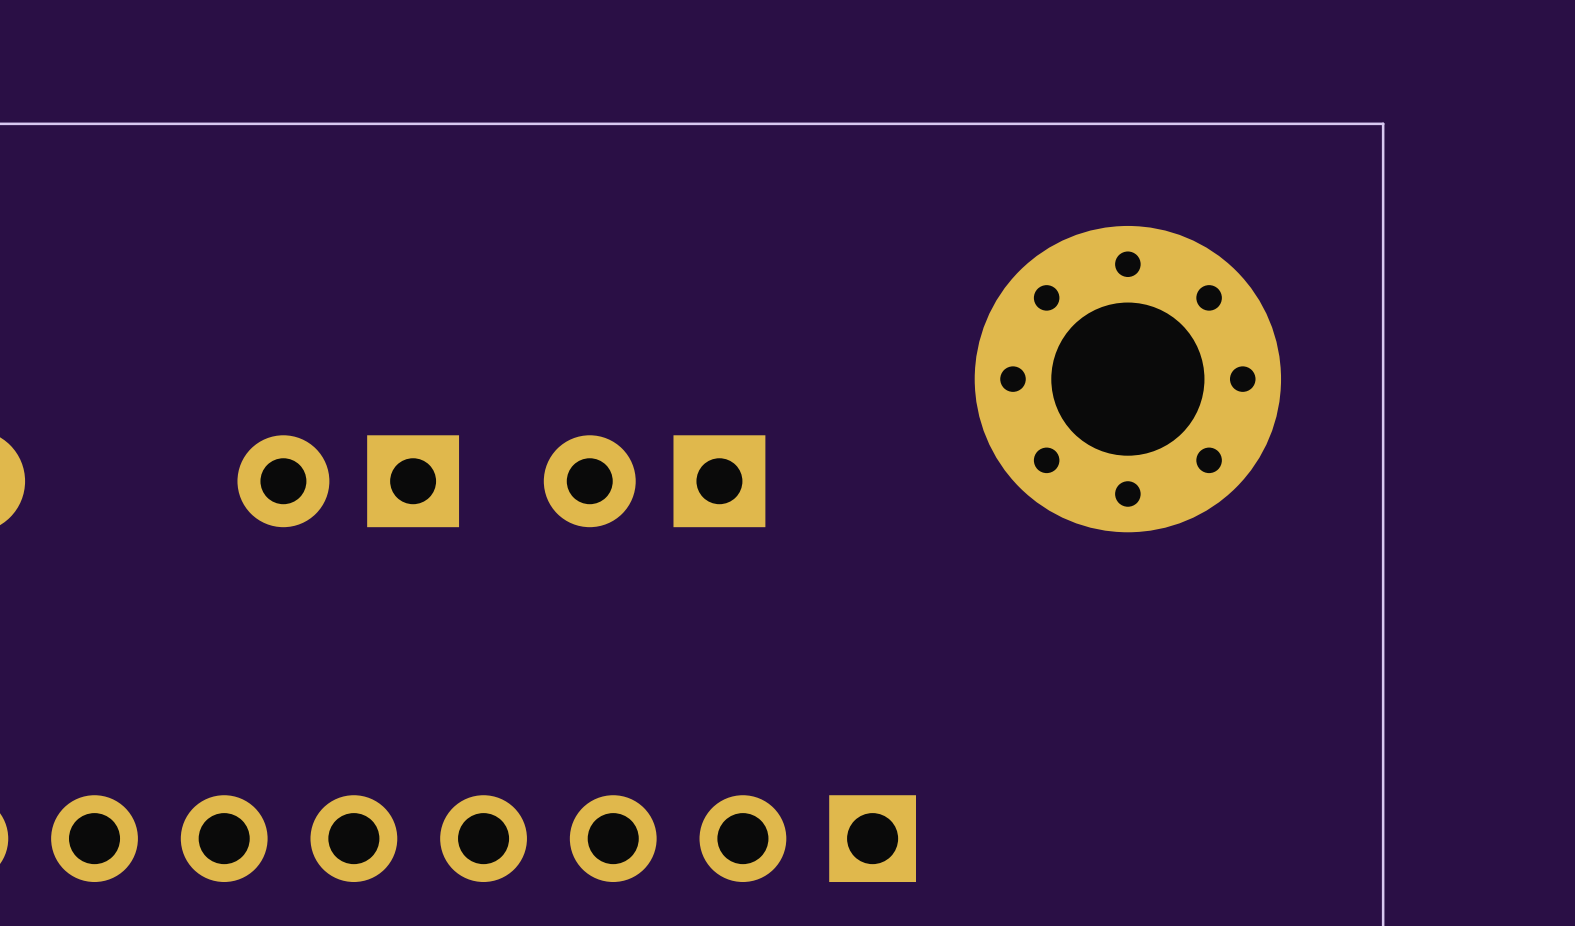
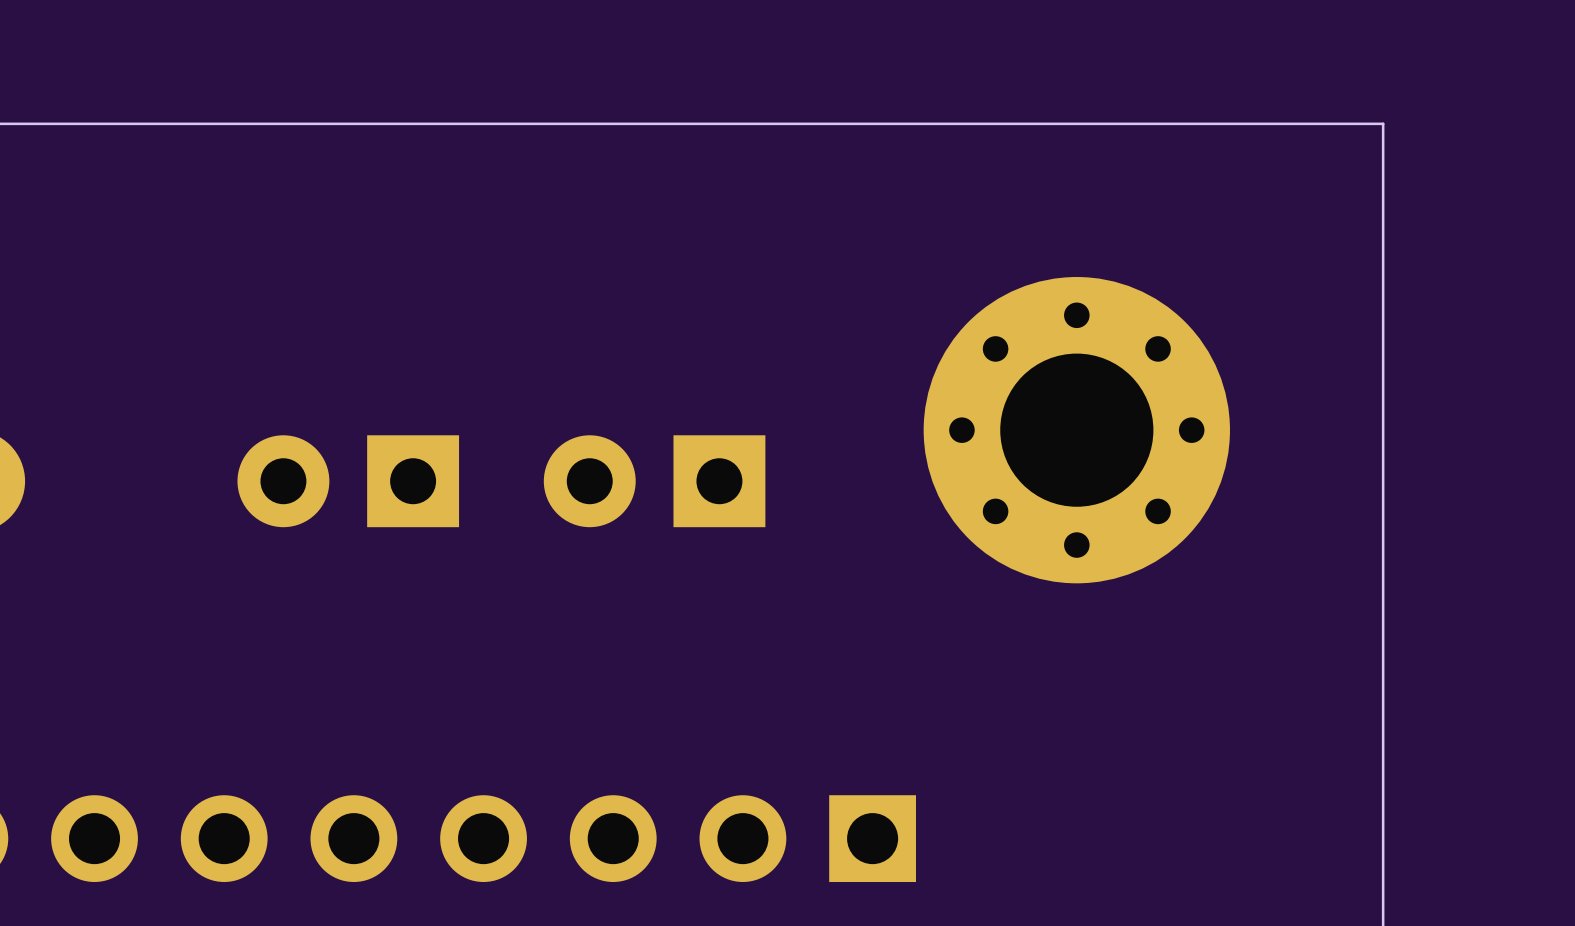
part position: (1127, 379) -> (1076, 430)

